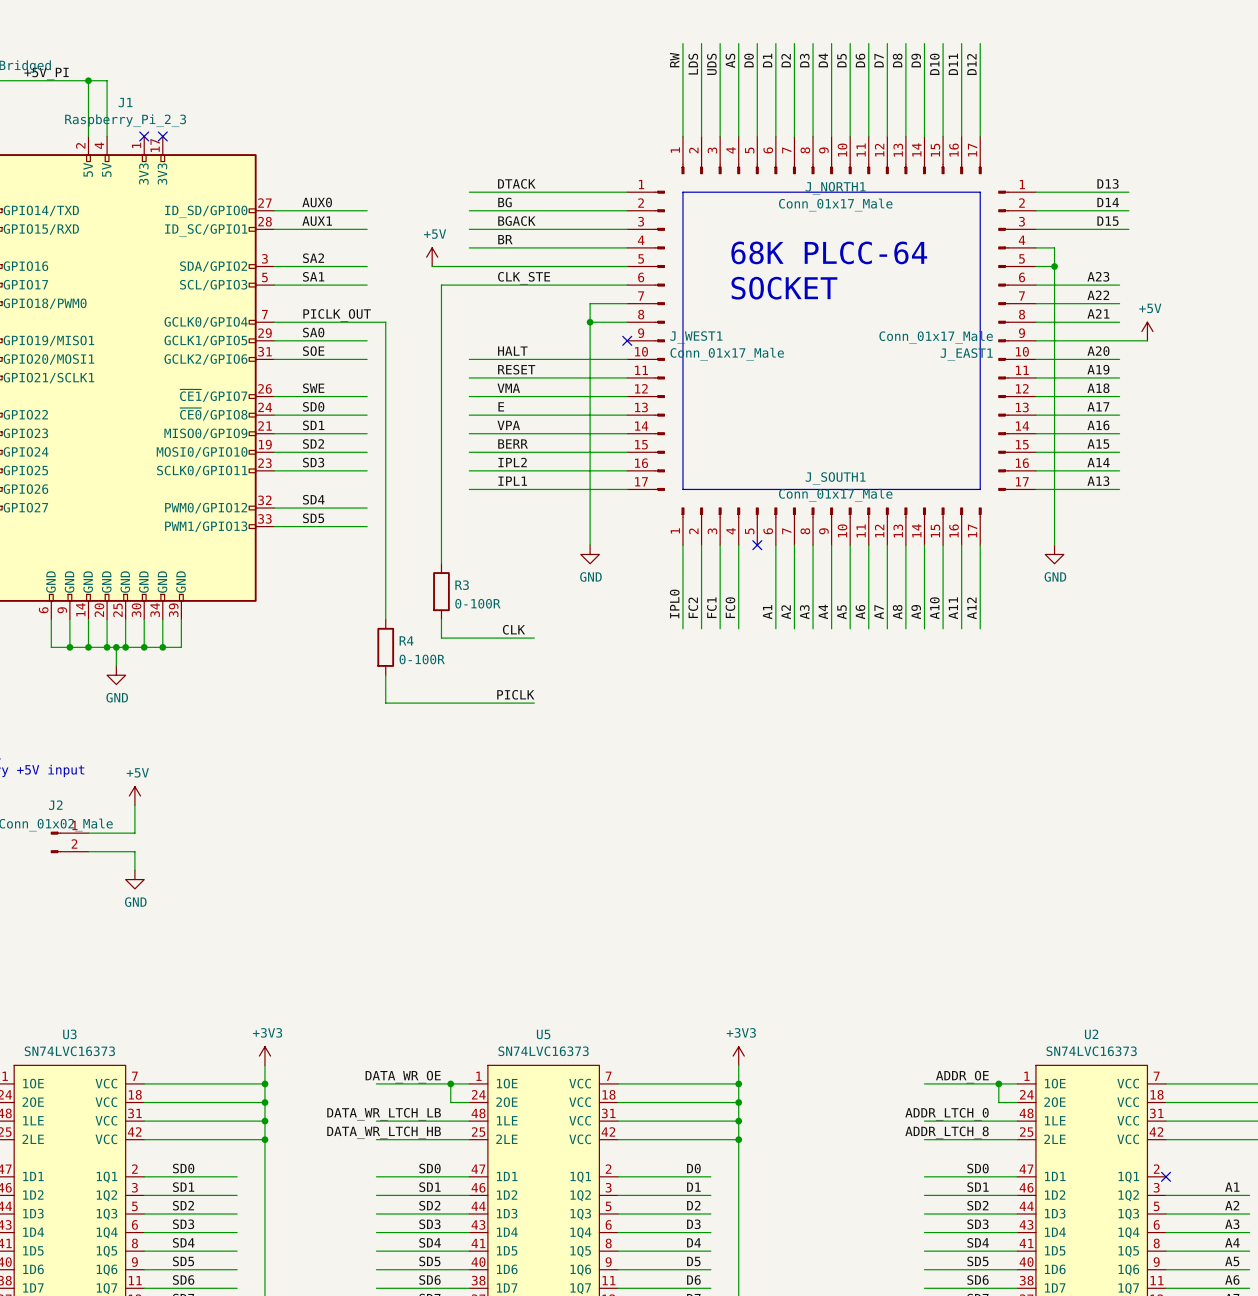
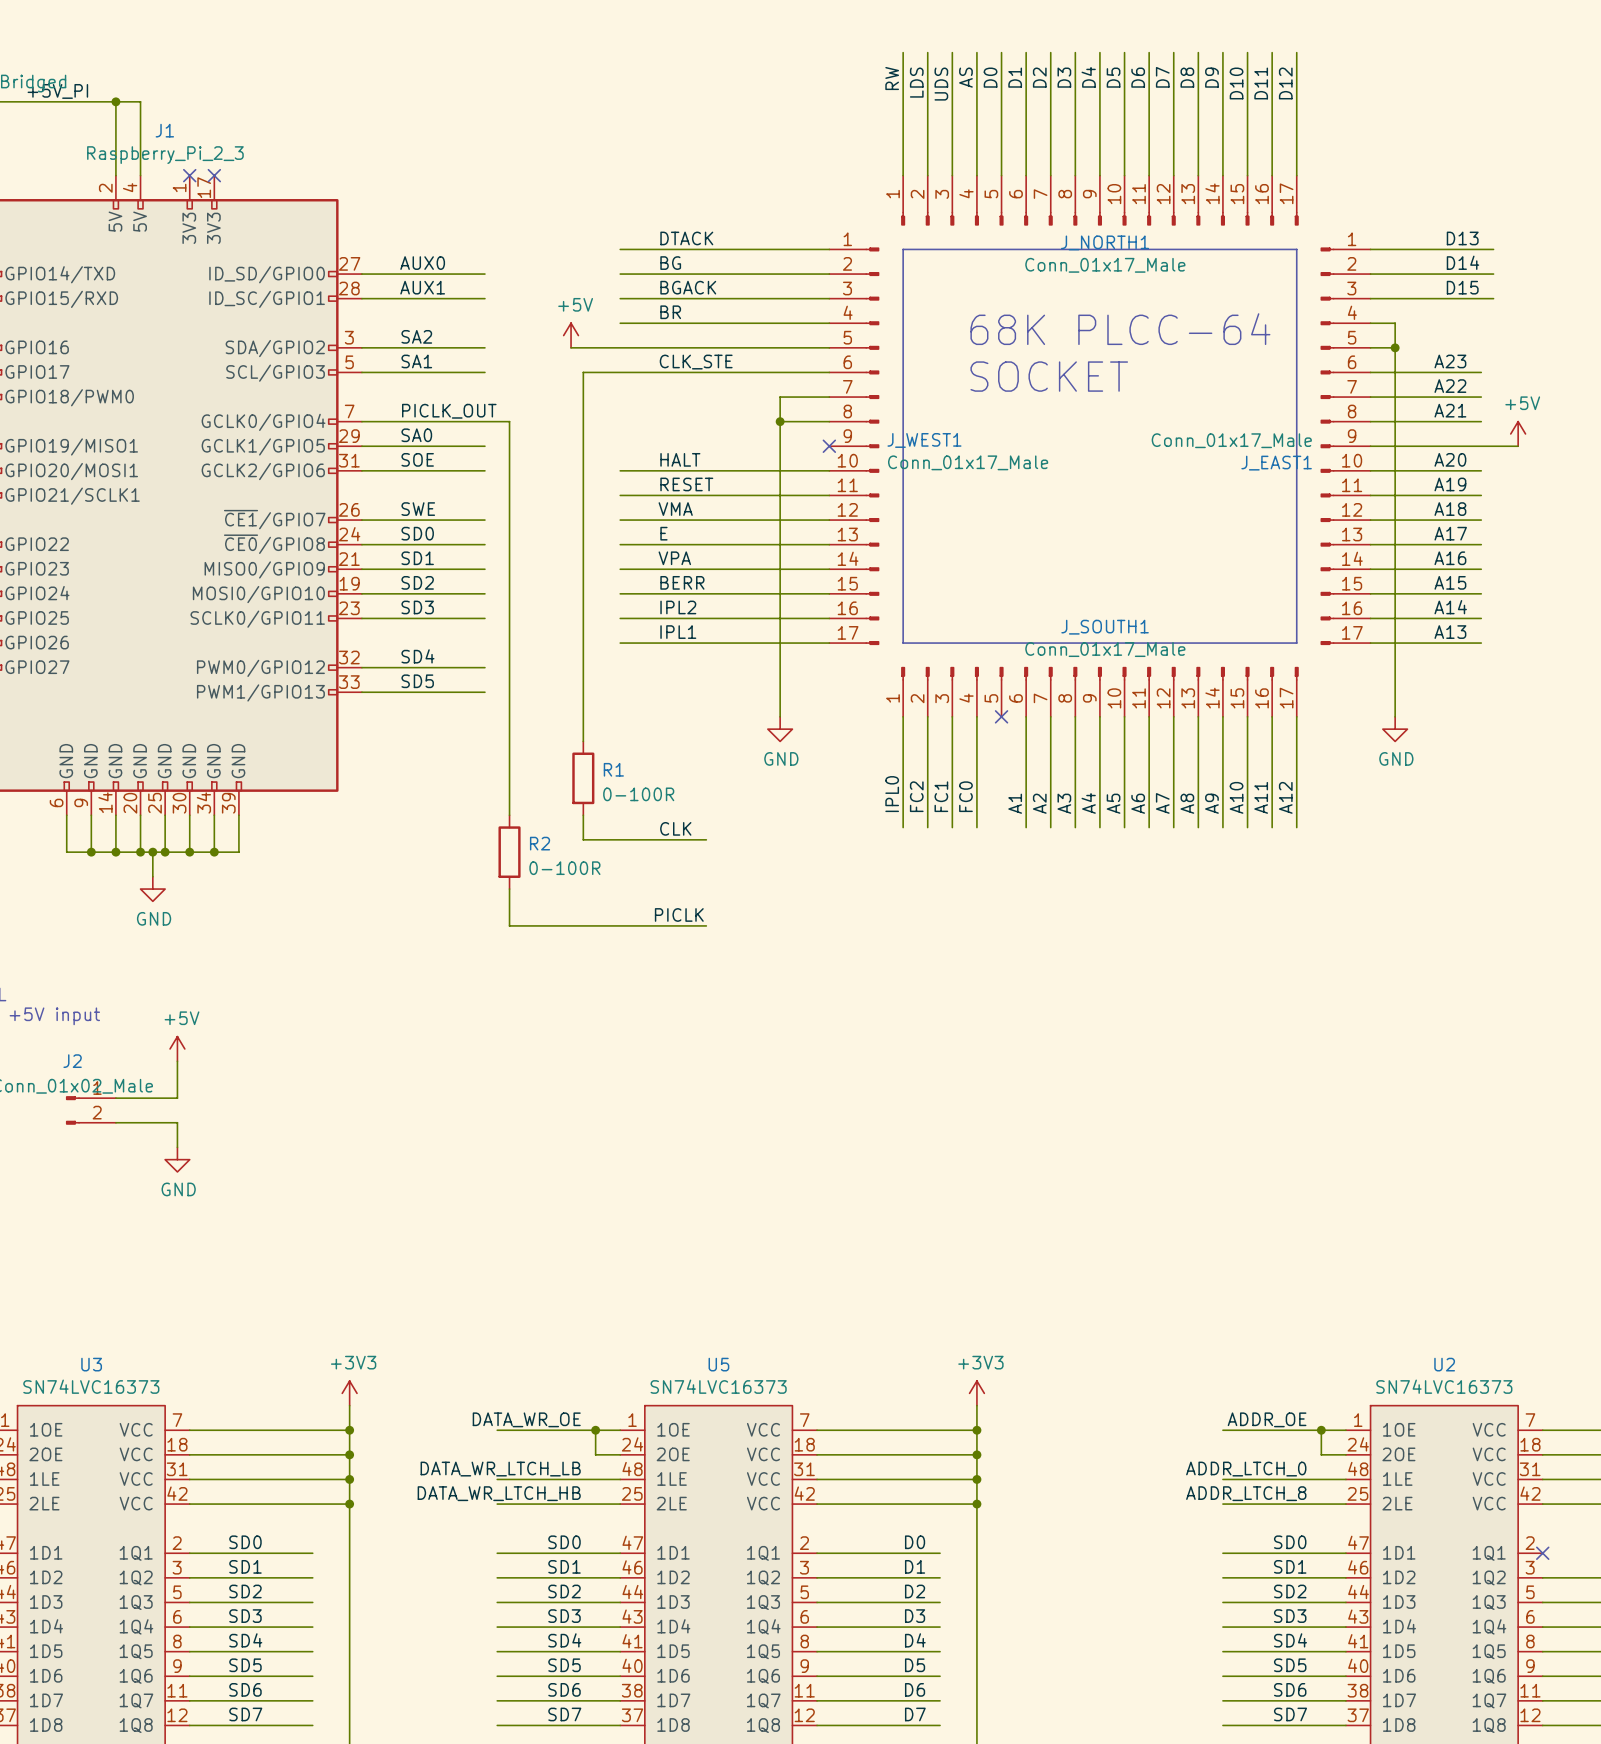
R3 name: R3 (462, 585) -> R1 (613, 769)
R4 name: R4 (406, 640) -> R2 (540, 843)

